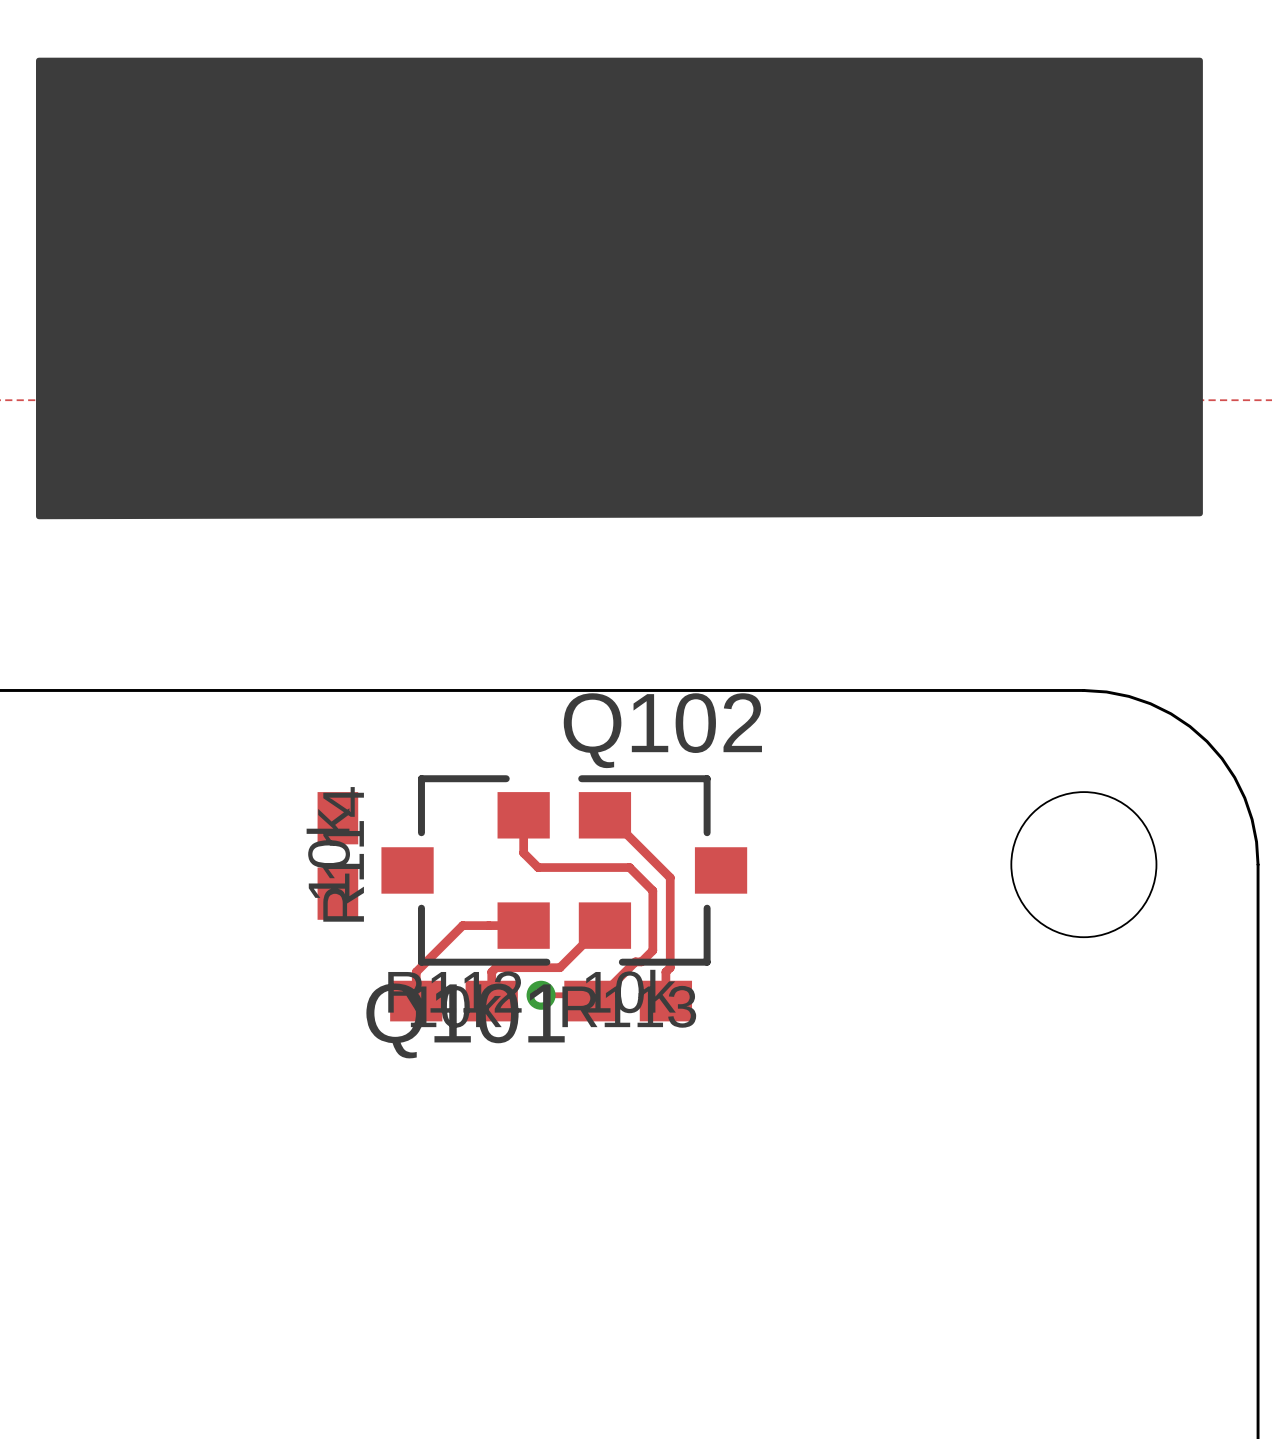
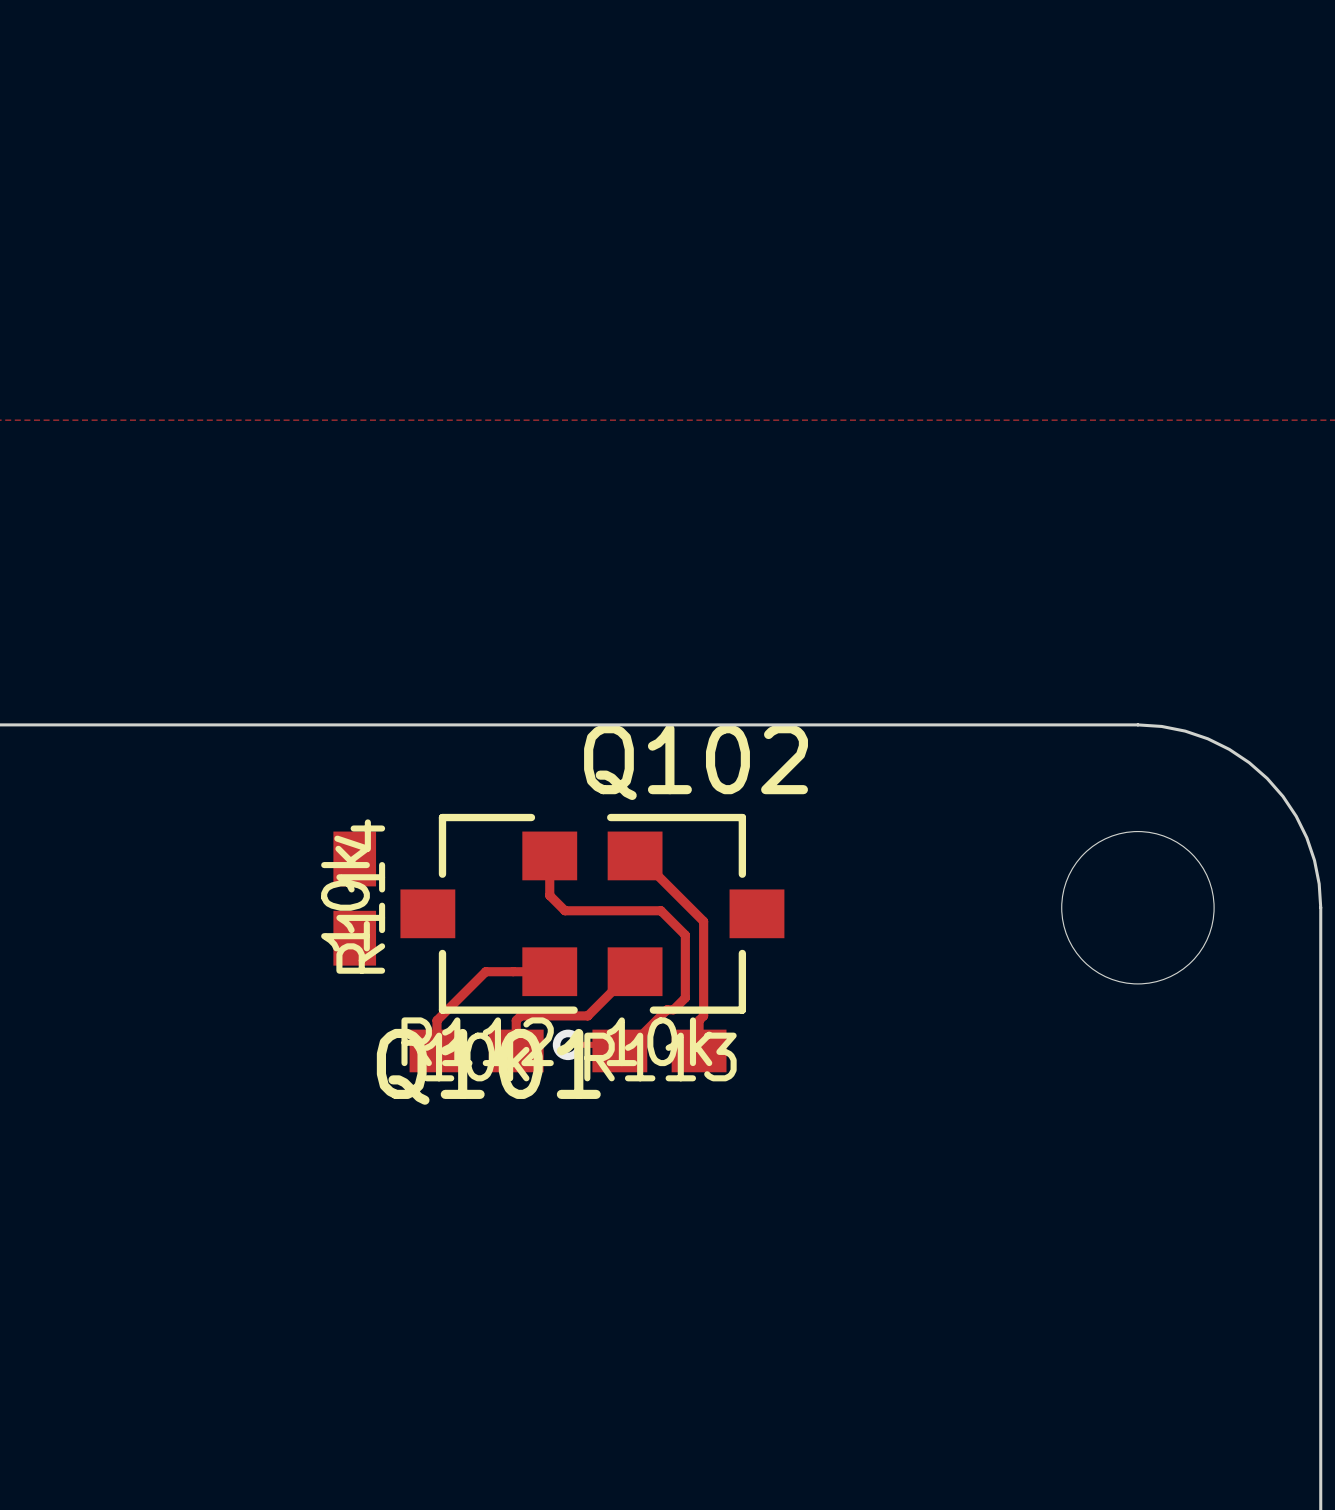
drawing: [36, 57, 1203, 520] -> none

